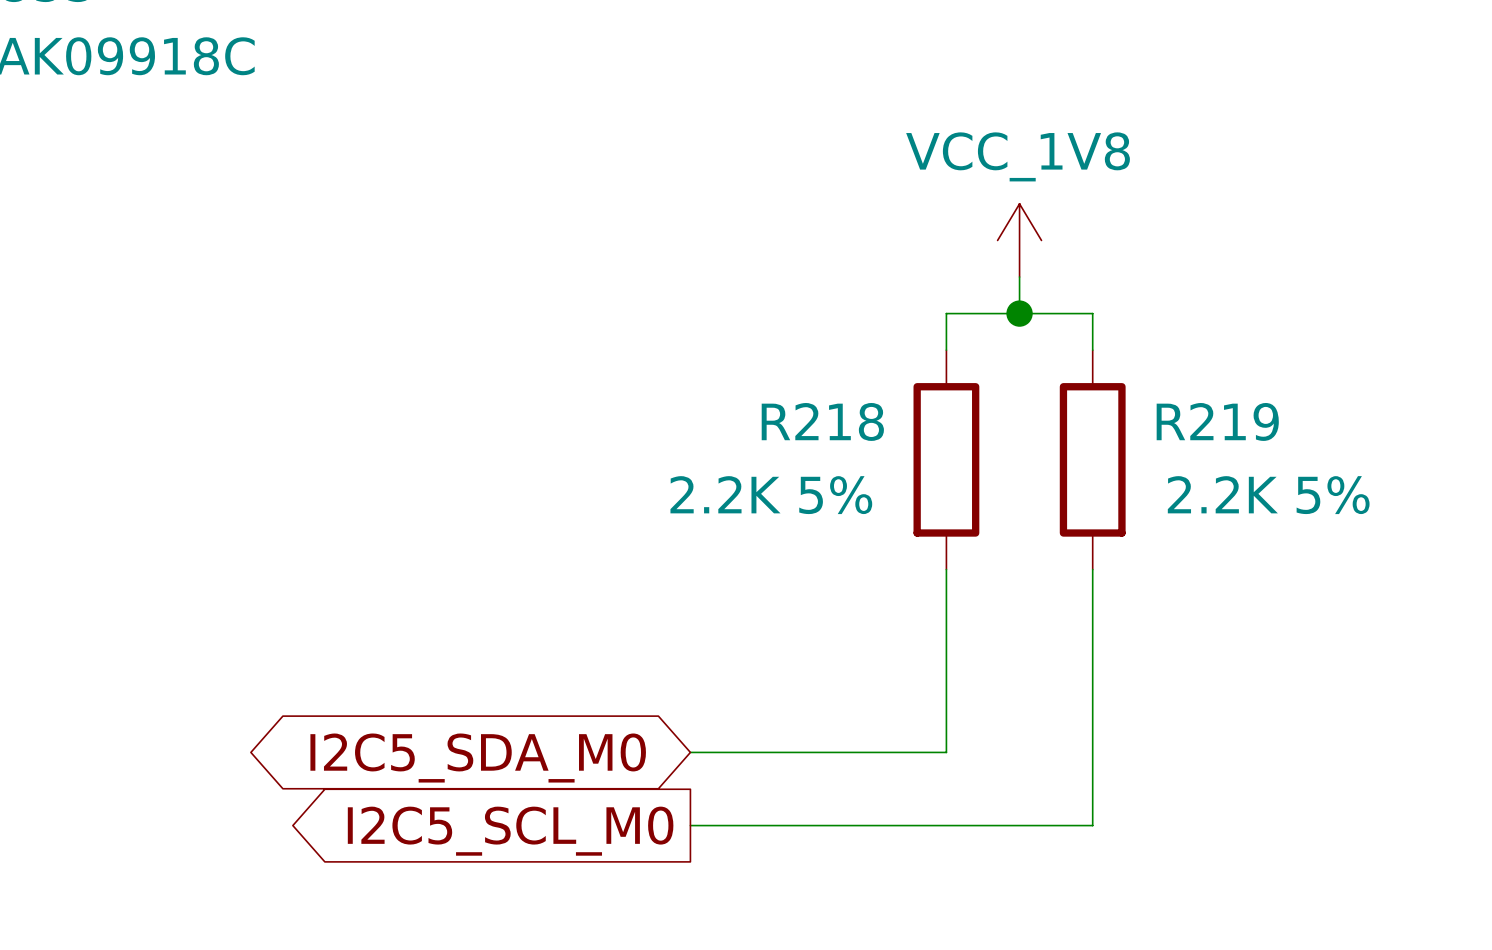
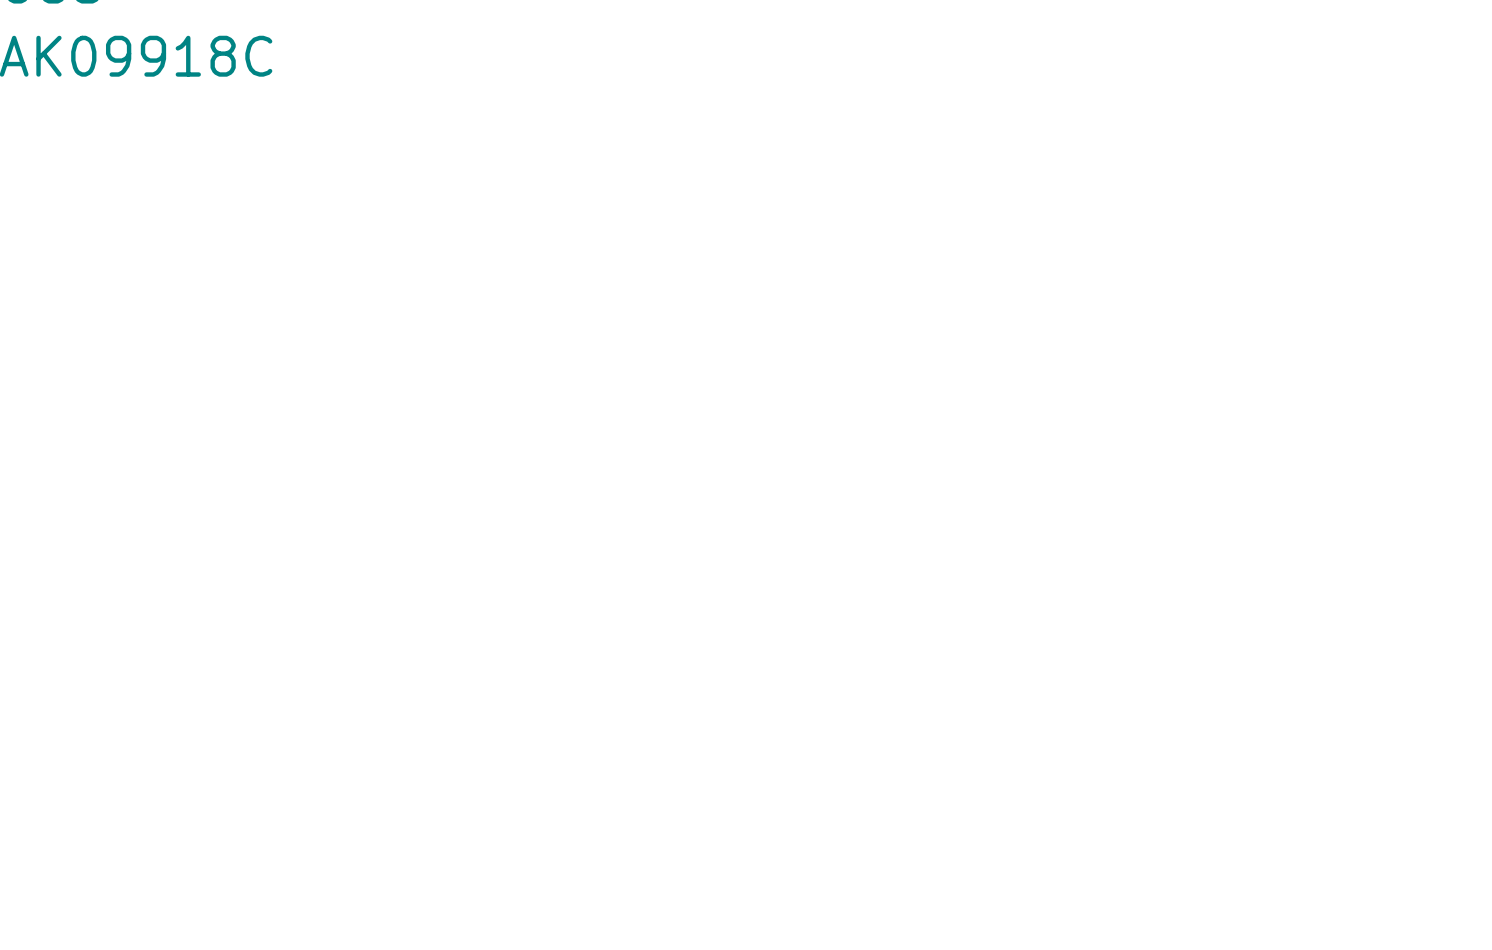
power symbol: VCC_1V8 (1019, 240) -> none
wire: (1019, 277) (1019, 313) -> none
junction: (1019, 313) -> none
wire: (946, 350) (946, 313) (1092, 313) (1092, 350) -> none
R218: 2.2K 5% (946, 459) -> none
R219: 2.2K 5% (1092, 459) -> none
wire: (946, 569) (946, 752) (690, 752) -> none
wire: (1092, 569) (1092, 825) (690, 825) -> none
global label: I2C5_SDA_M0 (478, 758) -> none
global label: I2C5_SCL_M0 (510, 831) -> none

